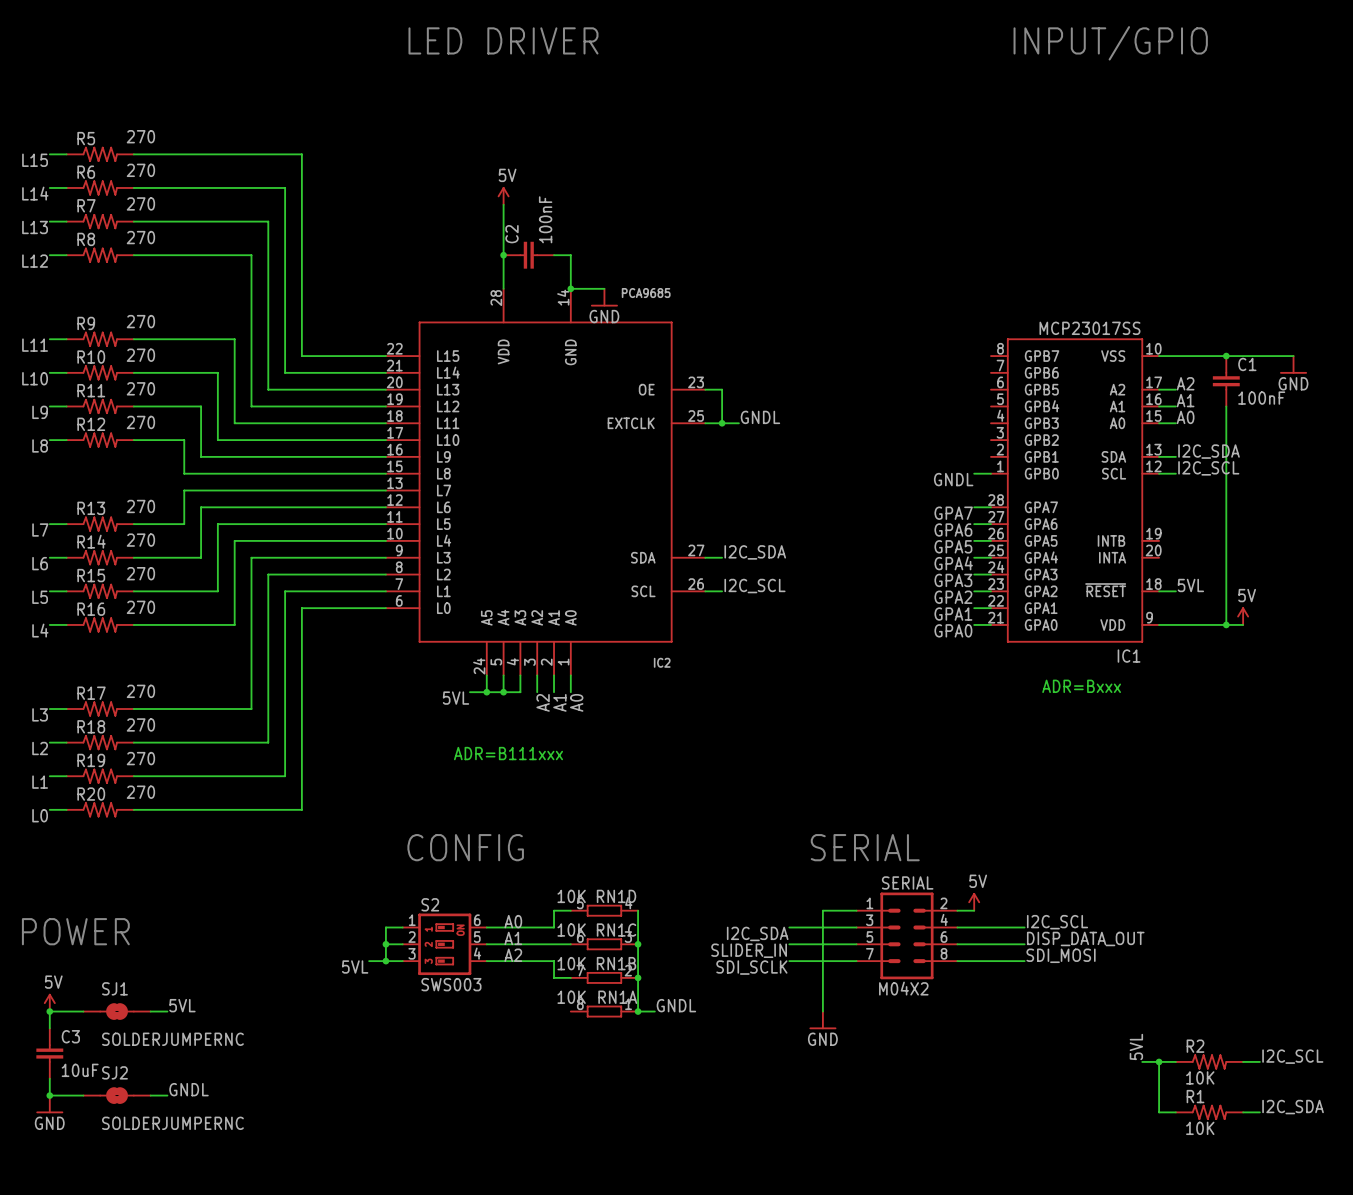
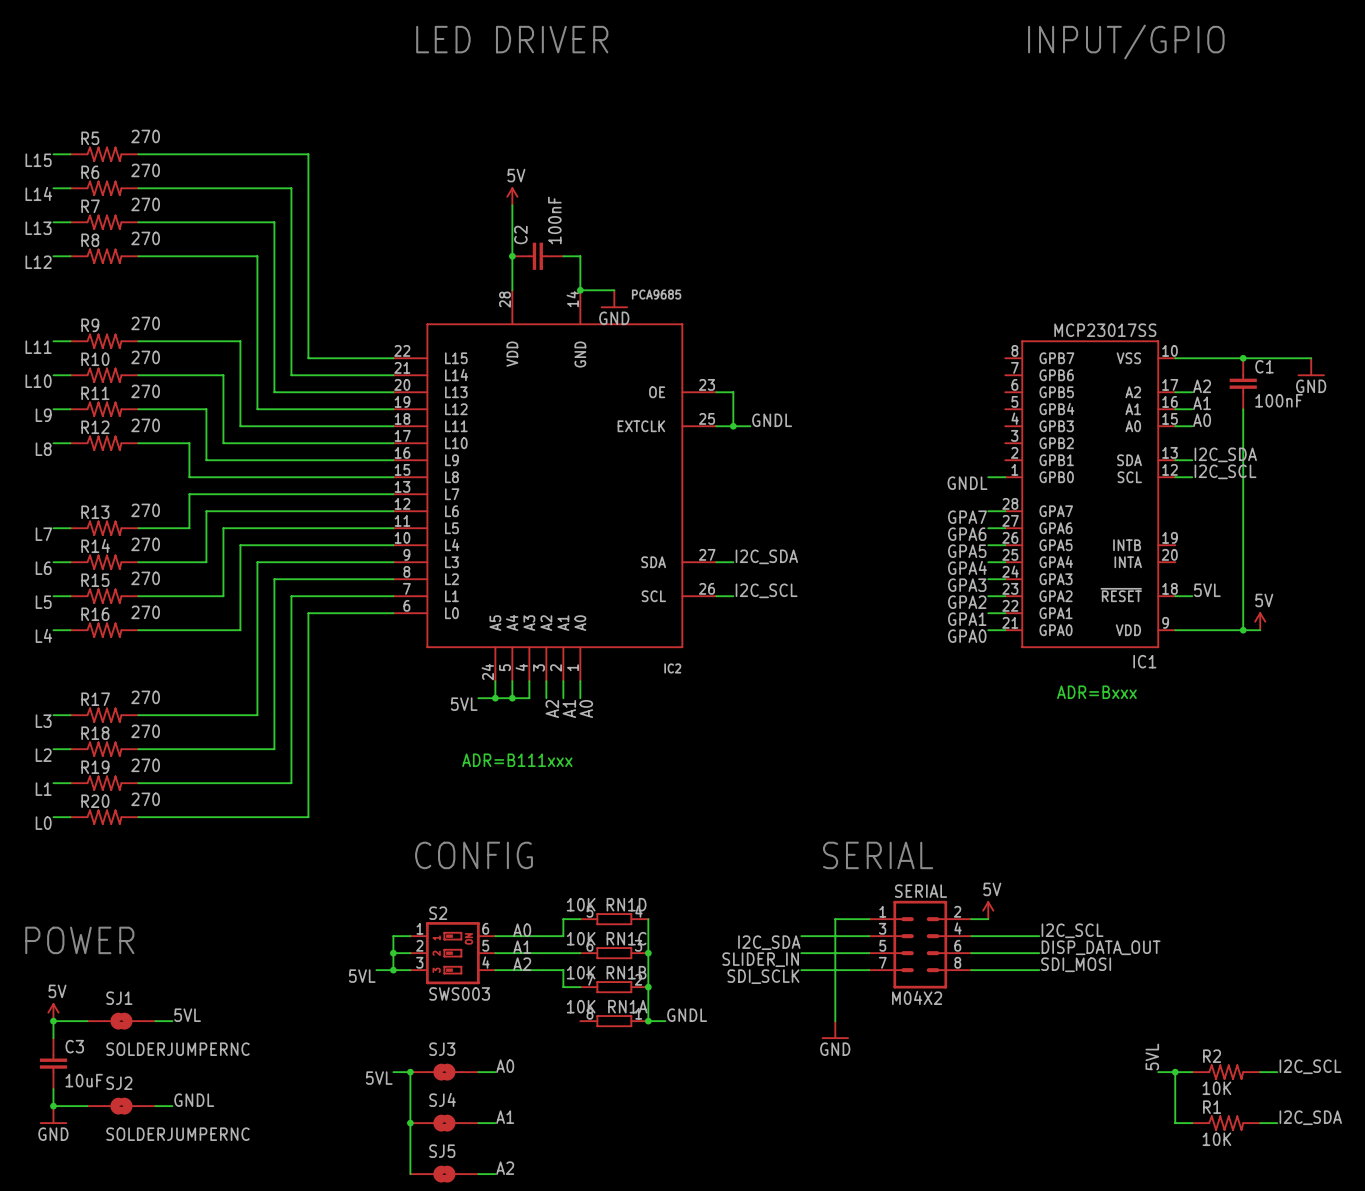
label: none -> A0 (505, 1066)
wire: none -> (393, 1072) (410, 1072) (410, 1174)
junction: none -> (410, 1072)
SJ3: none -> (444, 1072)
wire: none -> (478, 1072) (495, 1072)
label: none -> 5VL (379, 1078)
label: none -> A1 (505, 1117)
junction: none -> (410, 1123)
SJ4: none -> (444, 1123)
wire: none -> (478, 1123) (495, 1123)
label: none -> A2 (505, 1168)
SJ5: none -> (444, 1174)
wire: none -> (478, 1174) (495, 1174)

